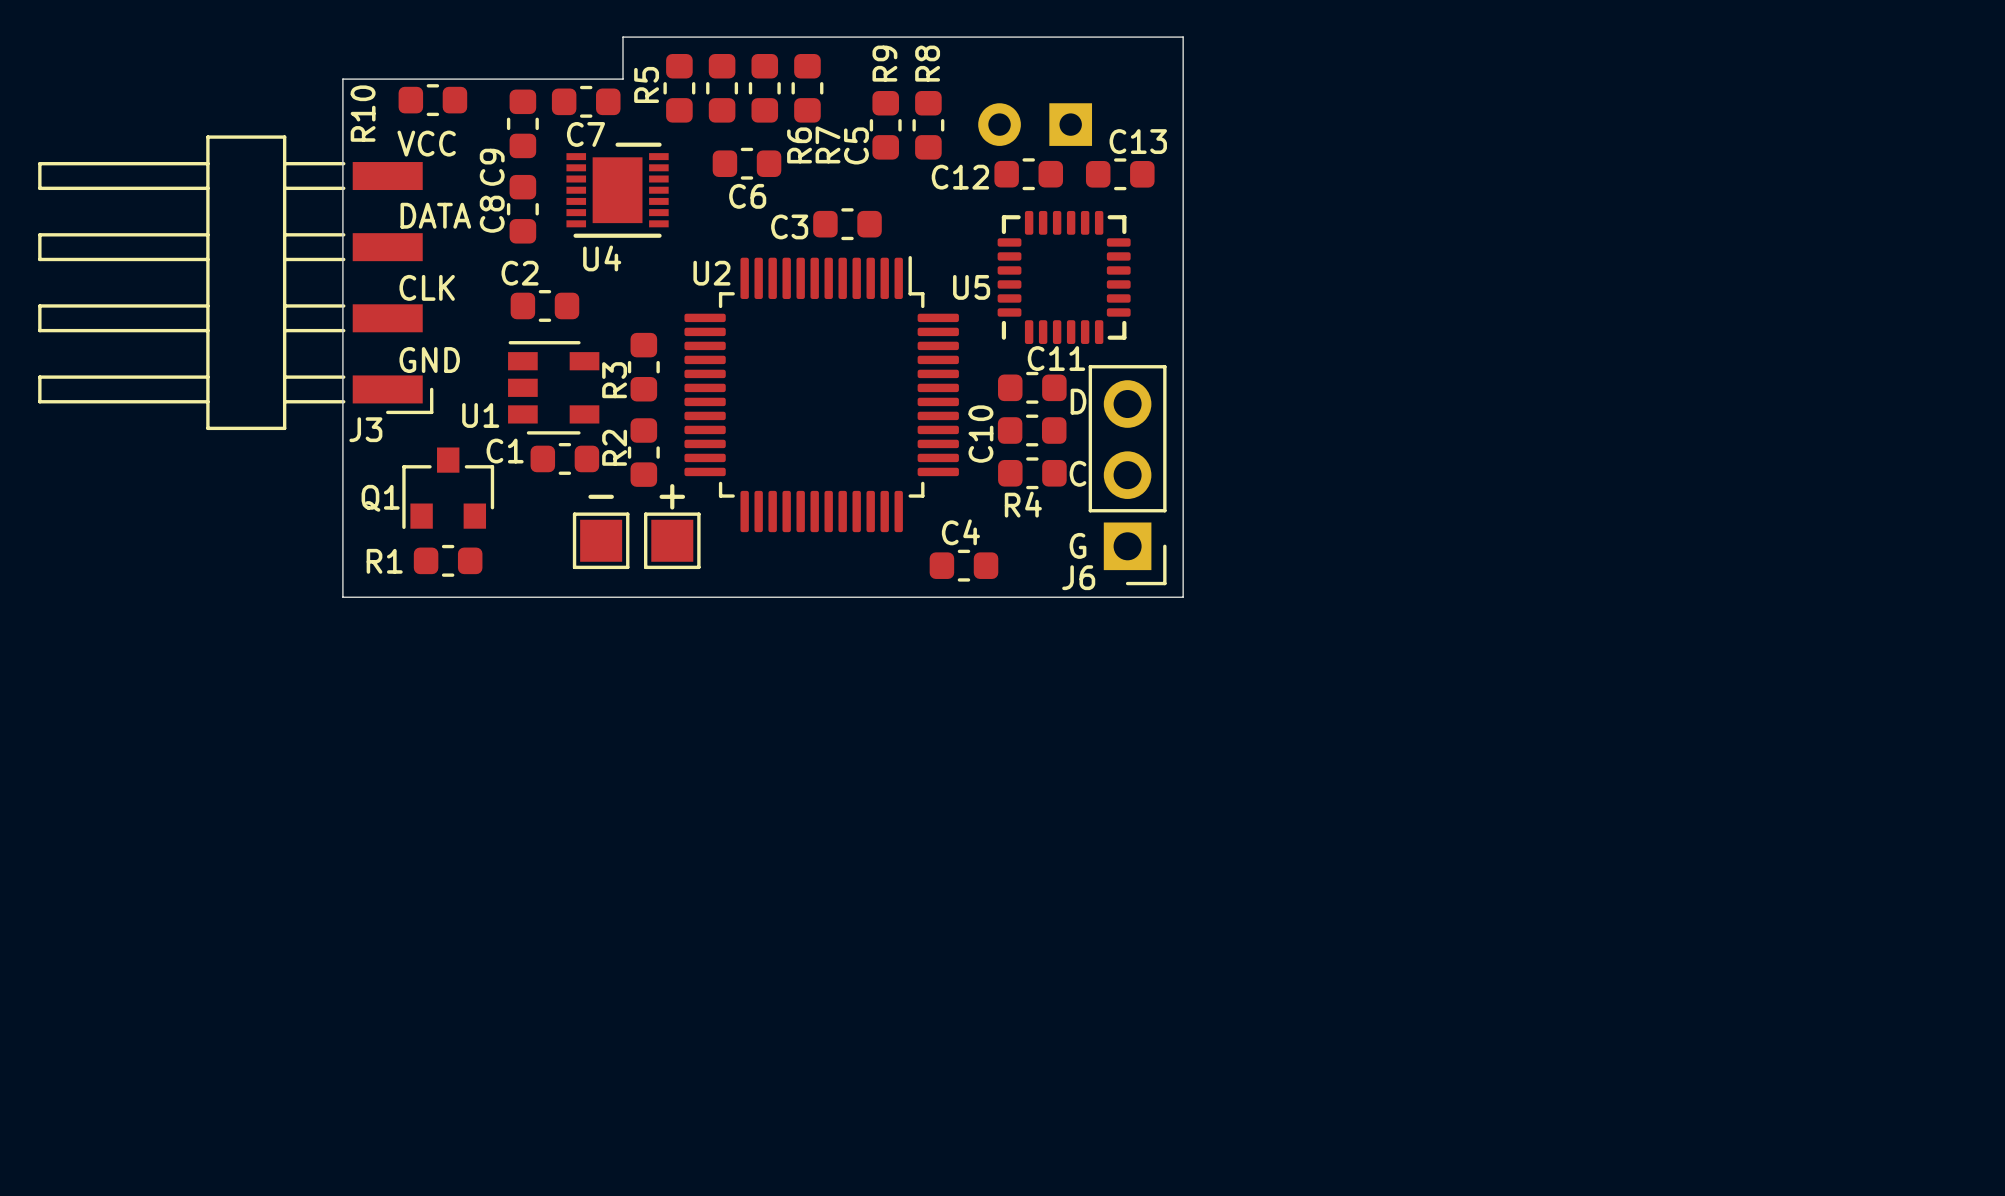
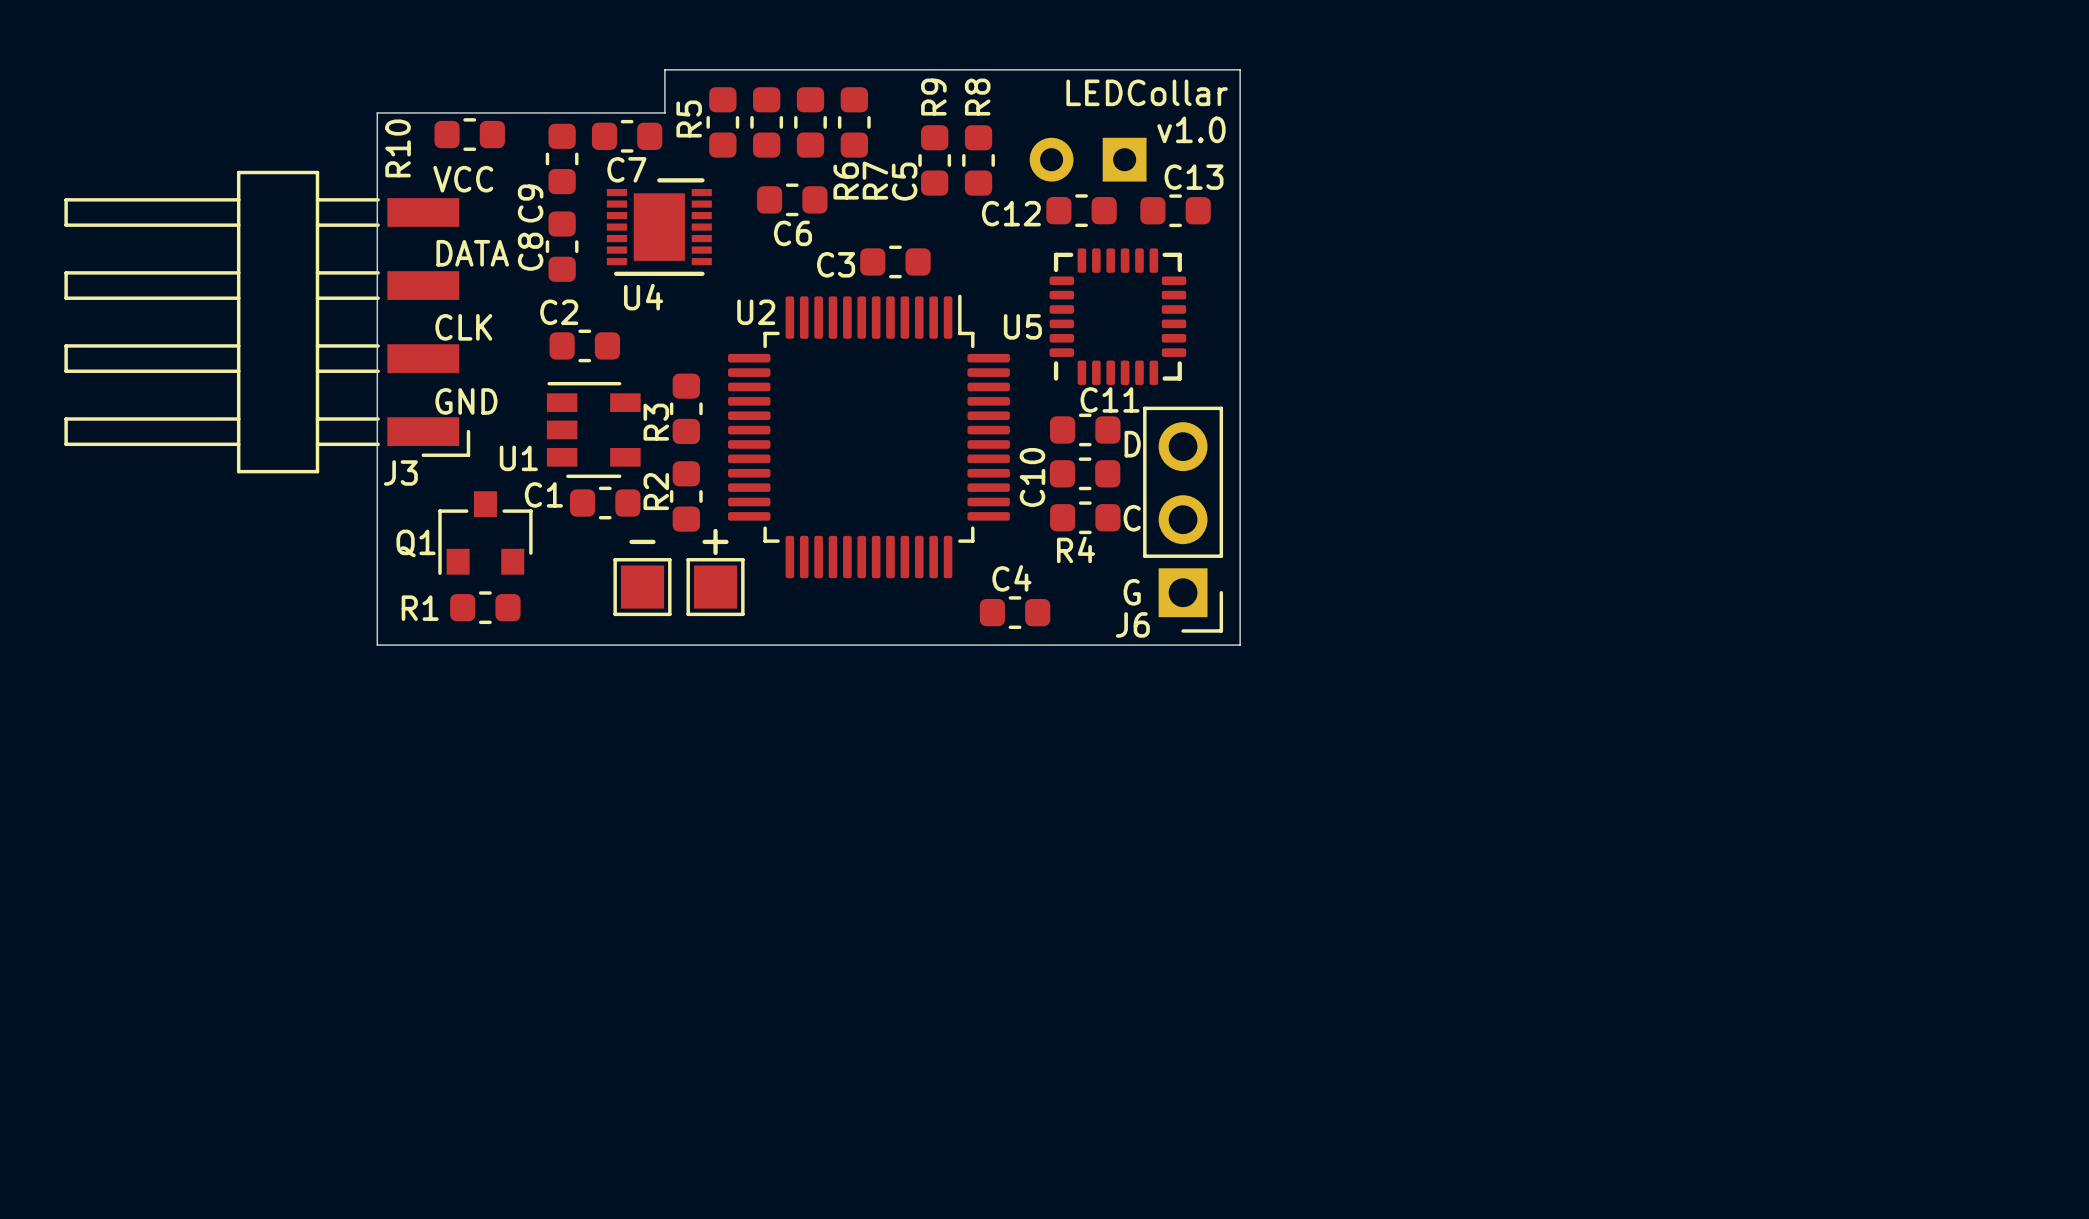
text: none -> LEDCollar (1147, 92)
text: none -> v1.0 (1191, 129)

